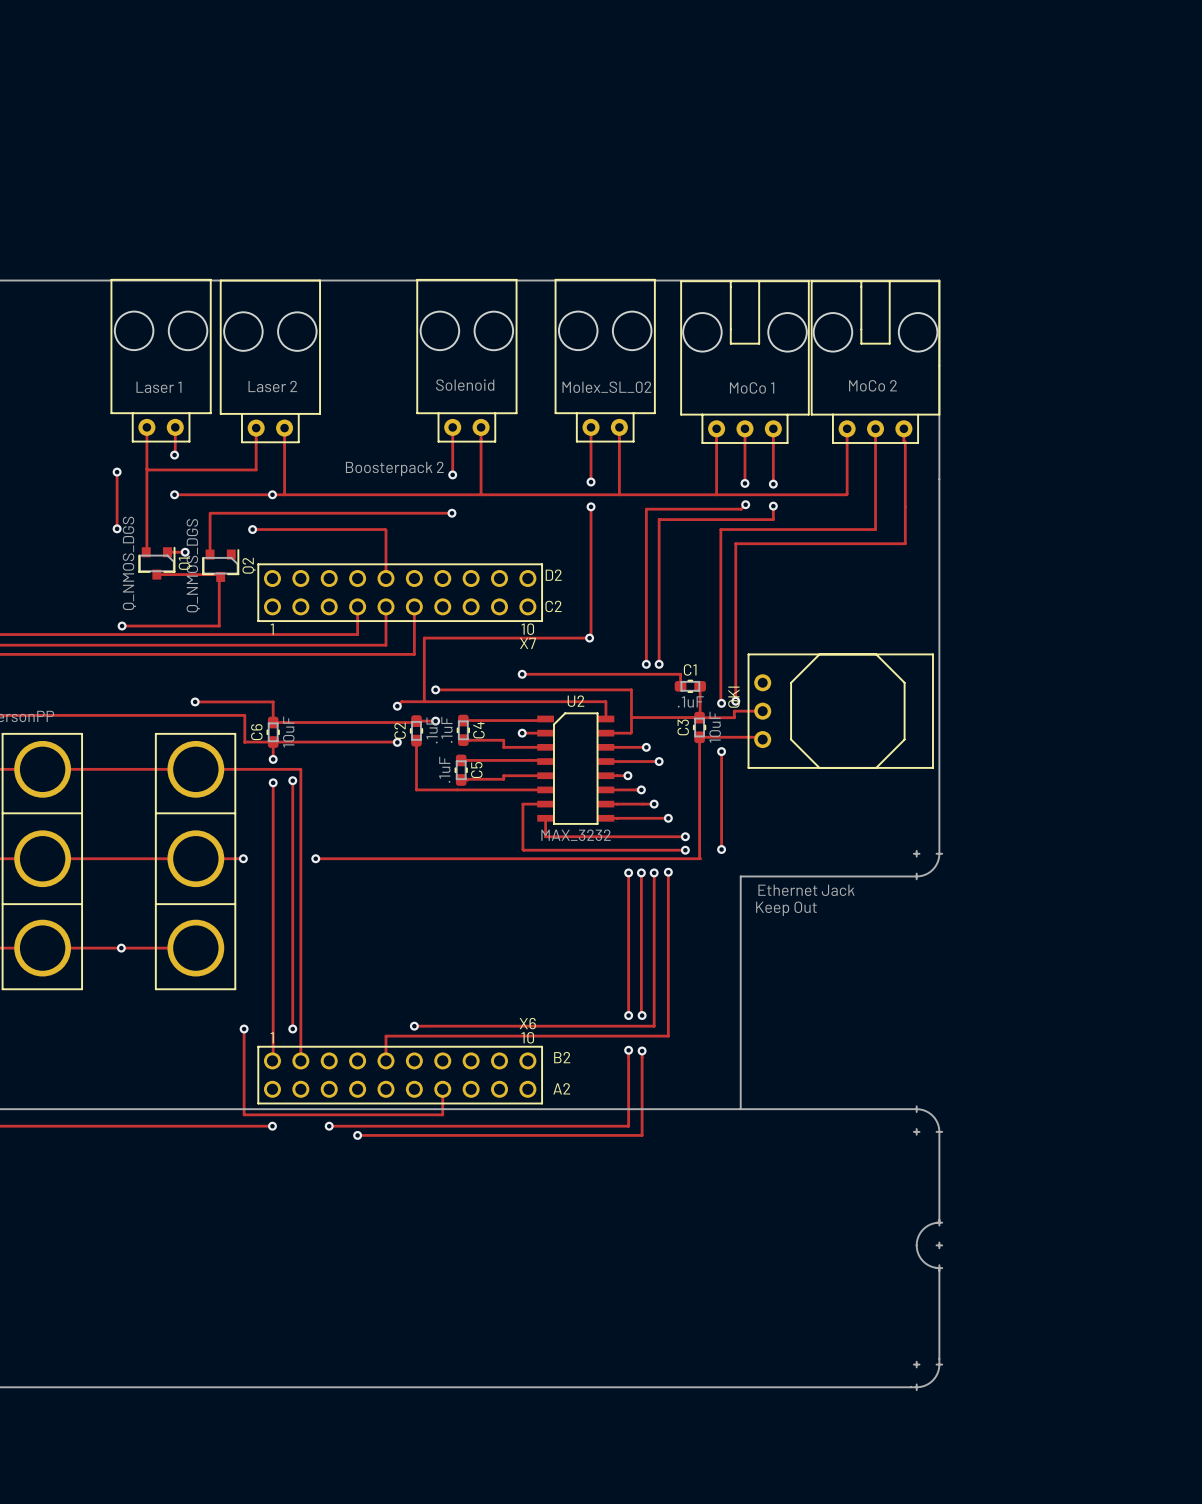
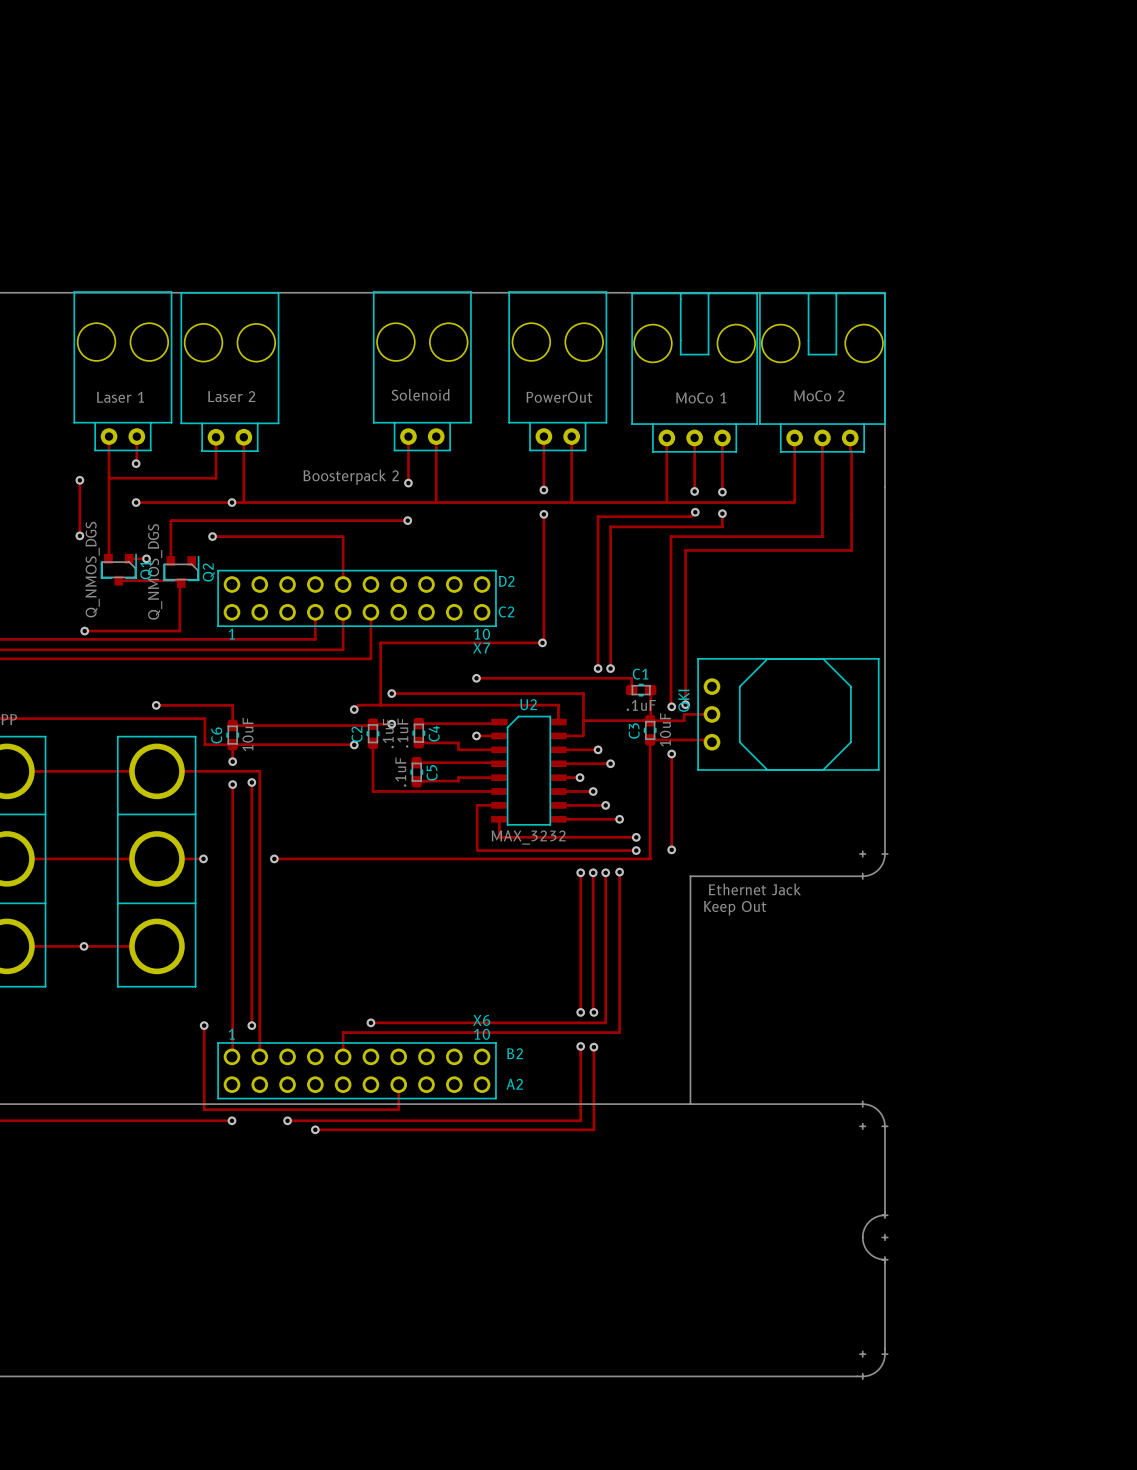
part value: Molex_SL_02 (606, 387) -> PowerOut (559, 397)

